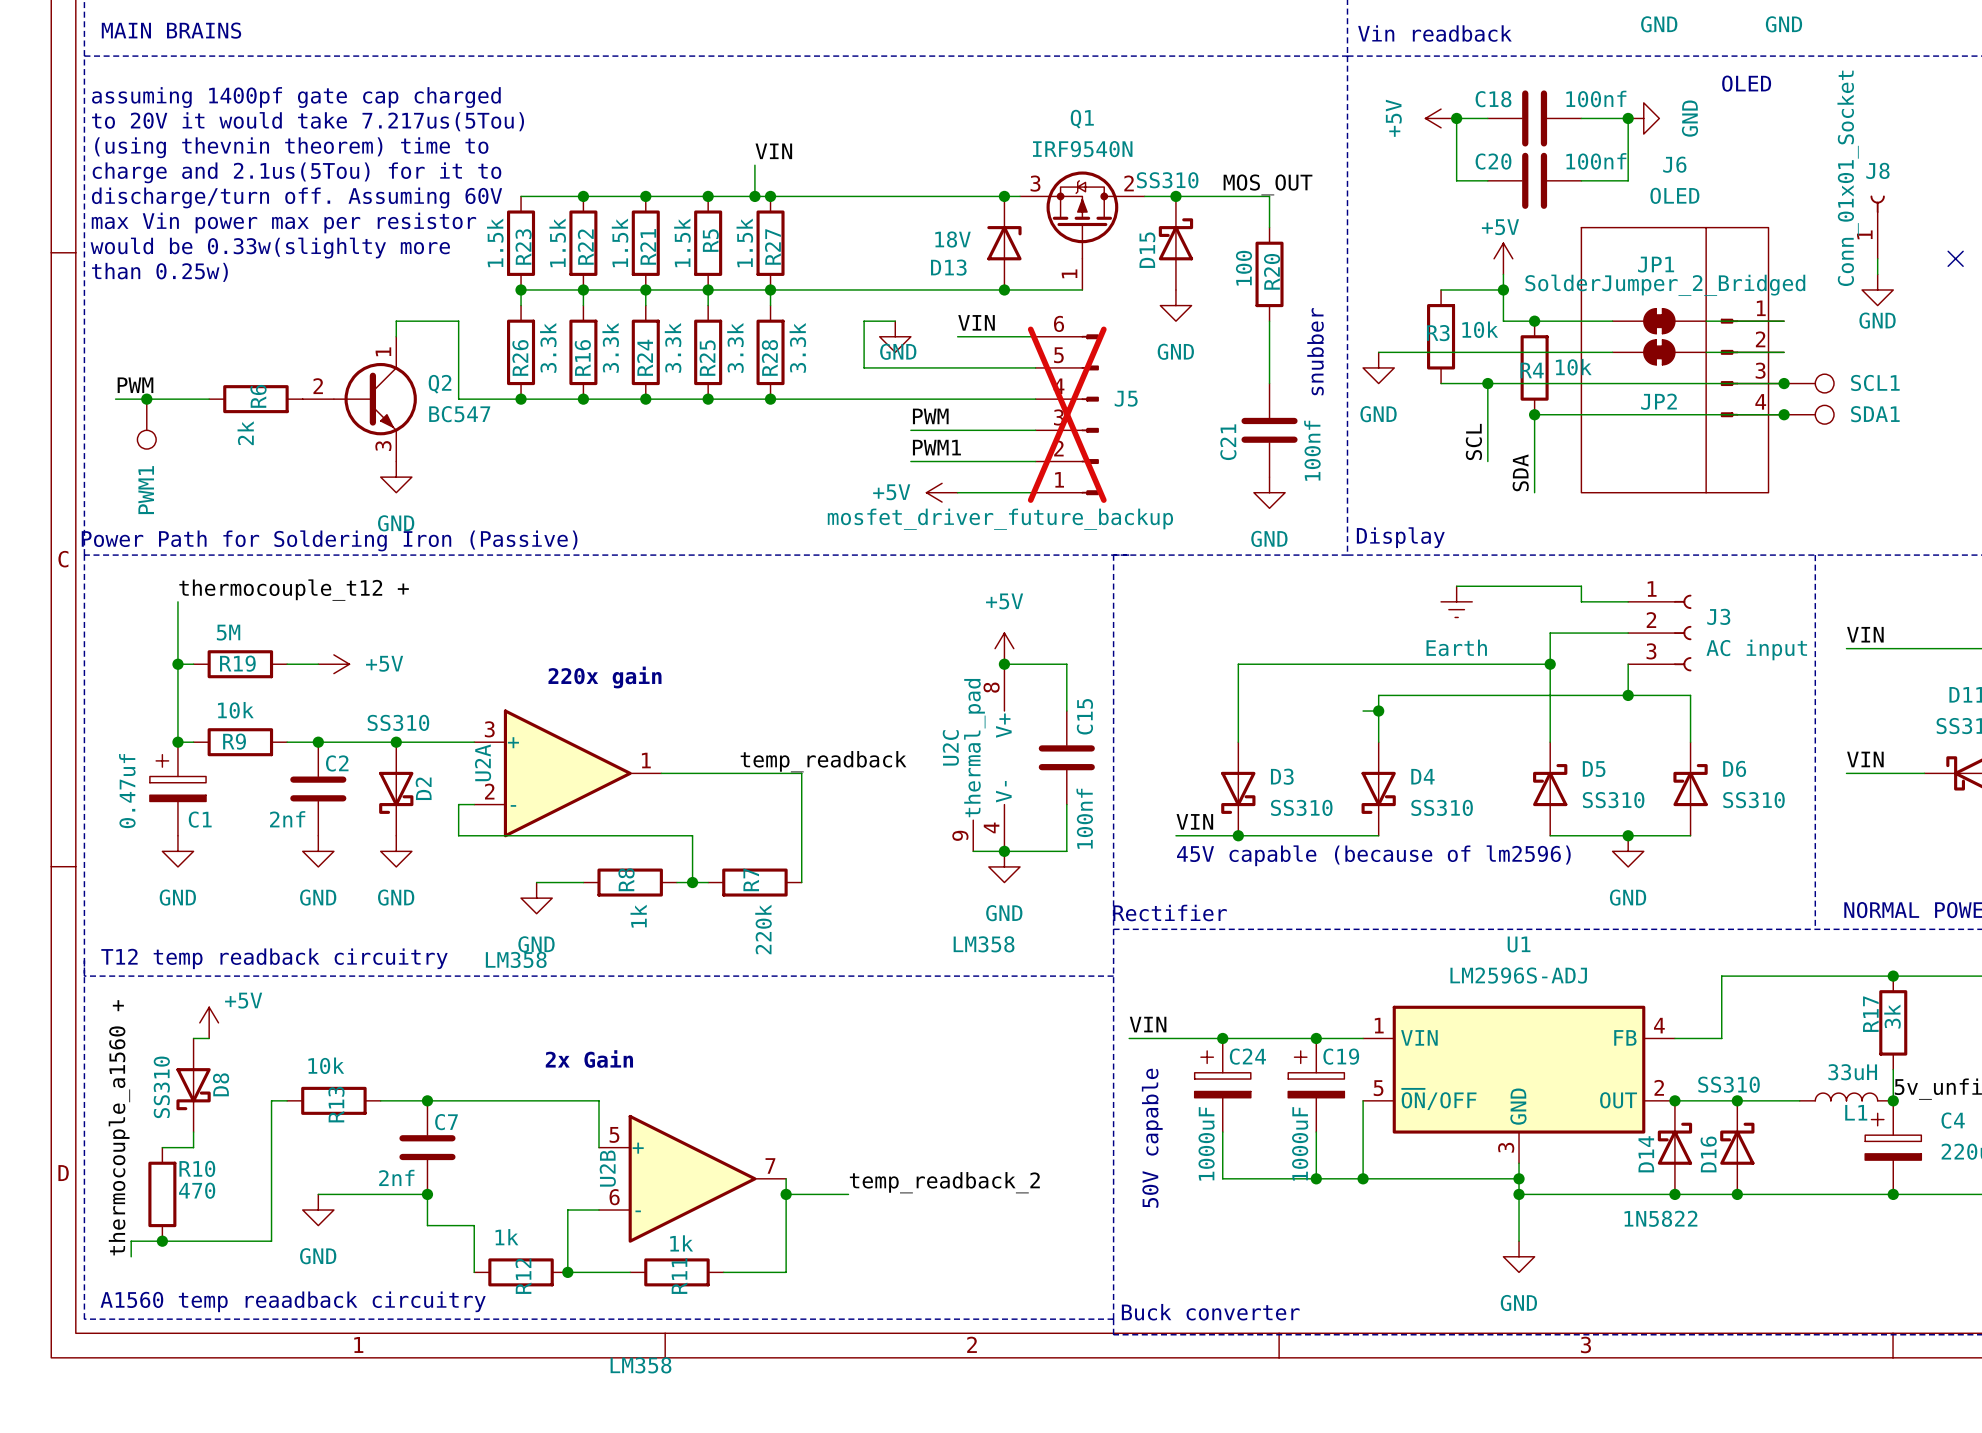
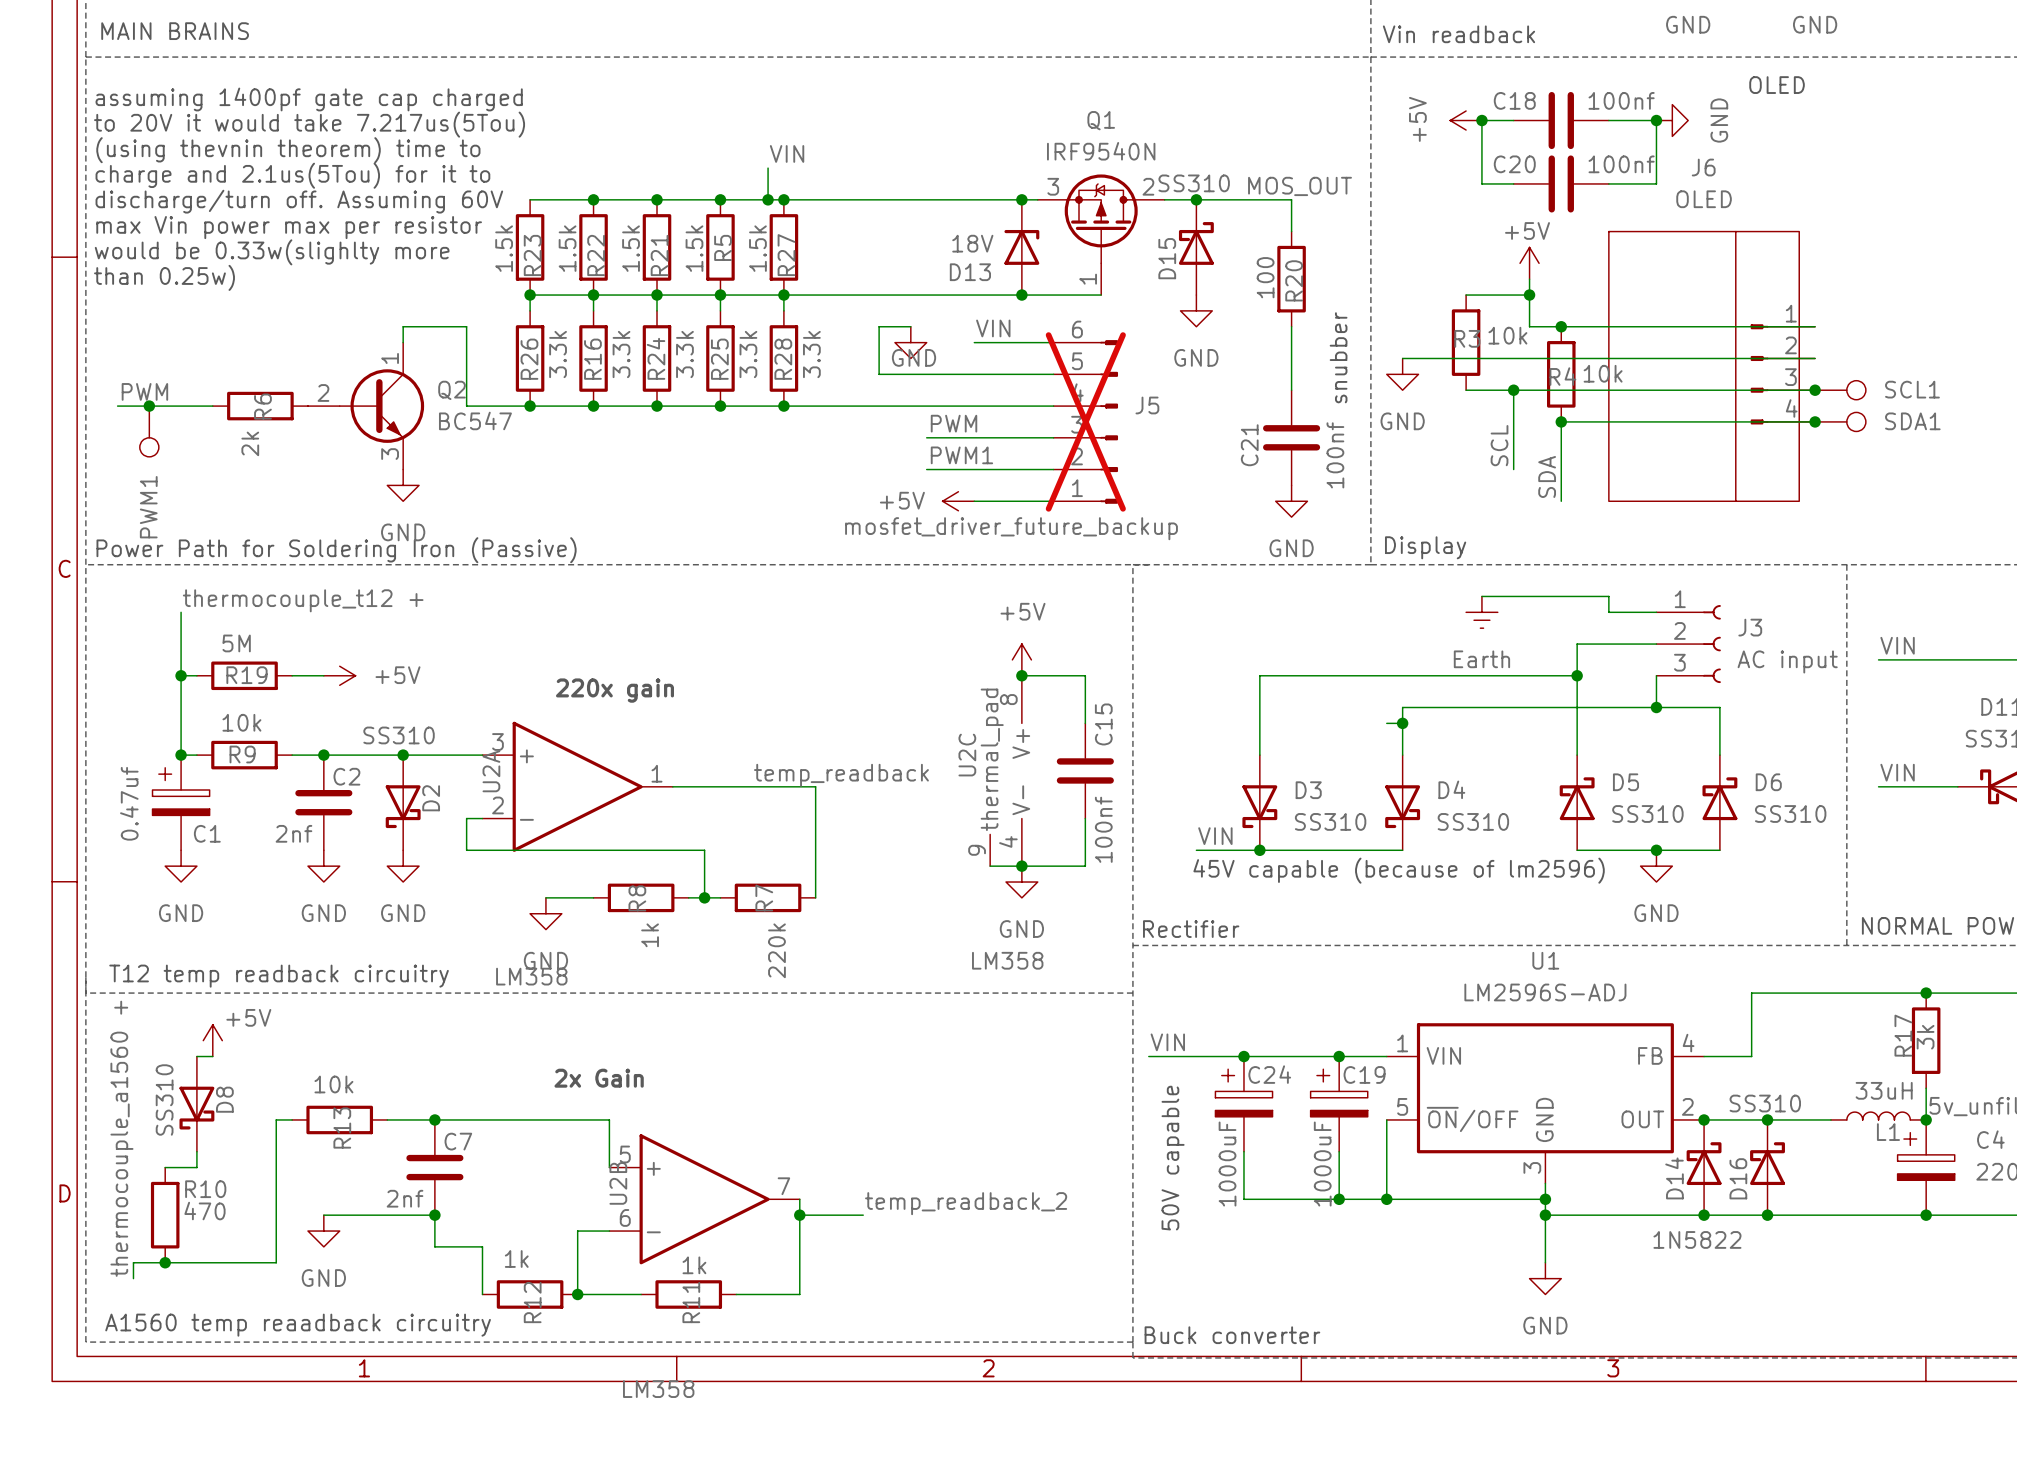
J8: Conn_01x01_Socket (1877, 227) -> none
wire: (1877, 258) (1877, 274) -> none
no-connect mark: (1955, 258) -> none
power symbol: GND (1877, 289) -> none
JP1: SolderJumper_2_Bridged (1659, 321) -> none
JP2: (1659, 352) -> none

